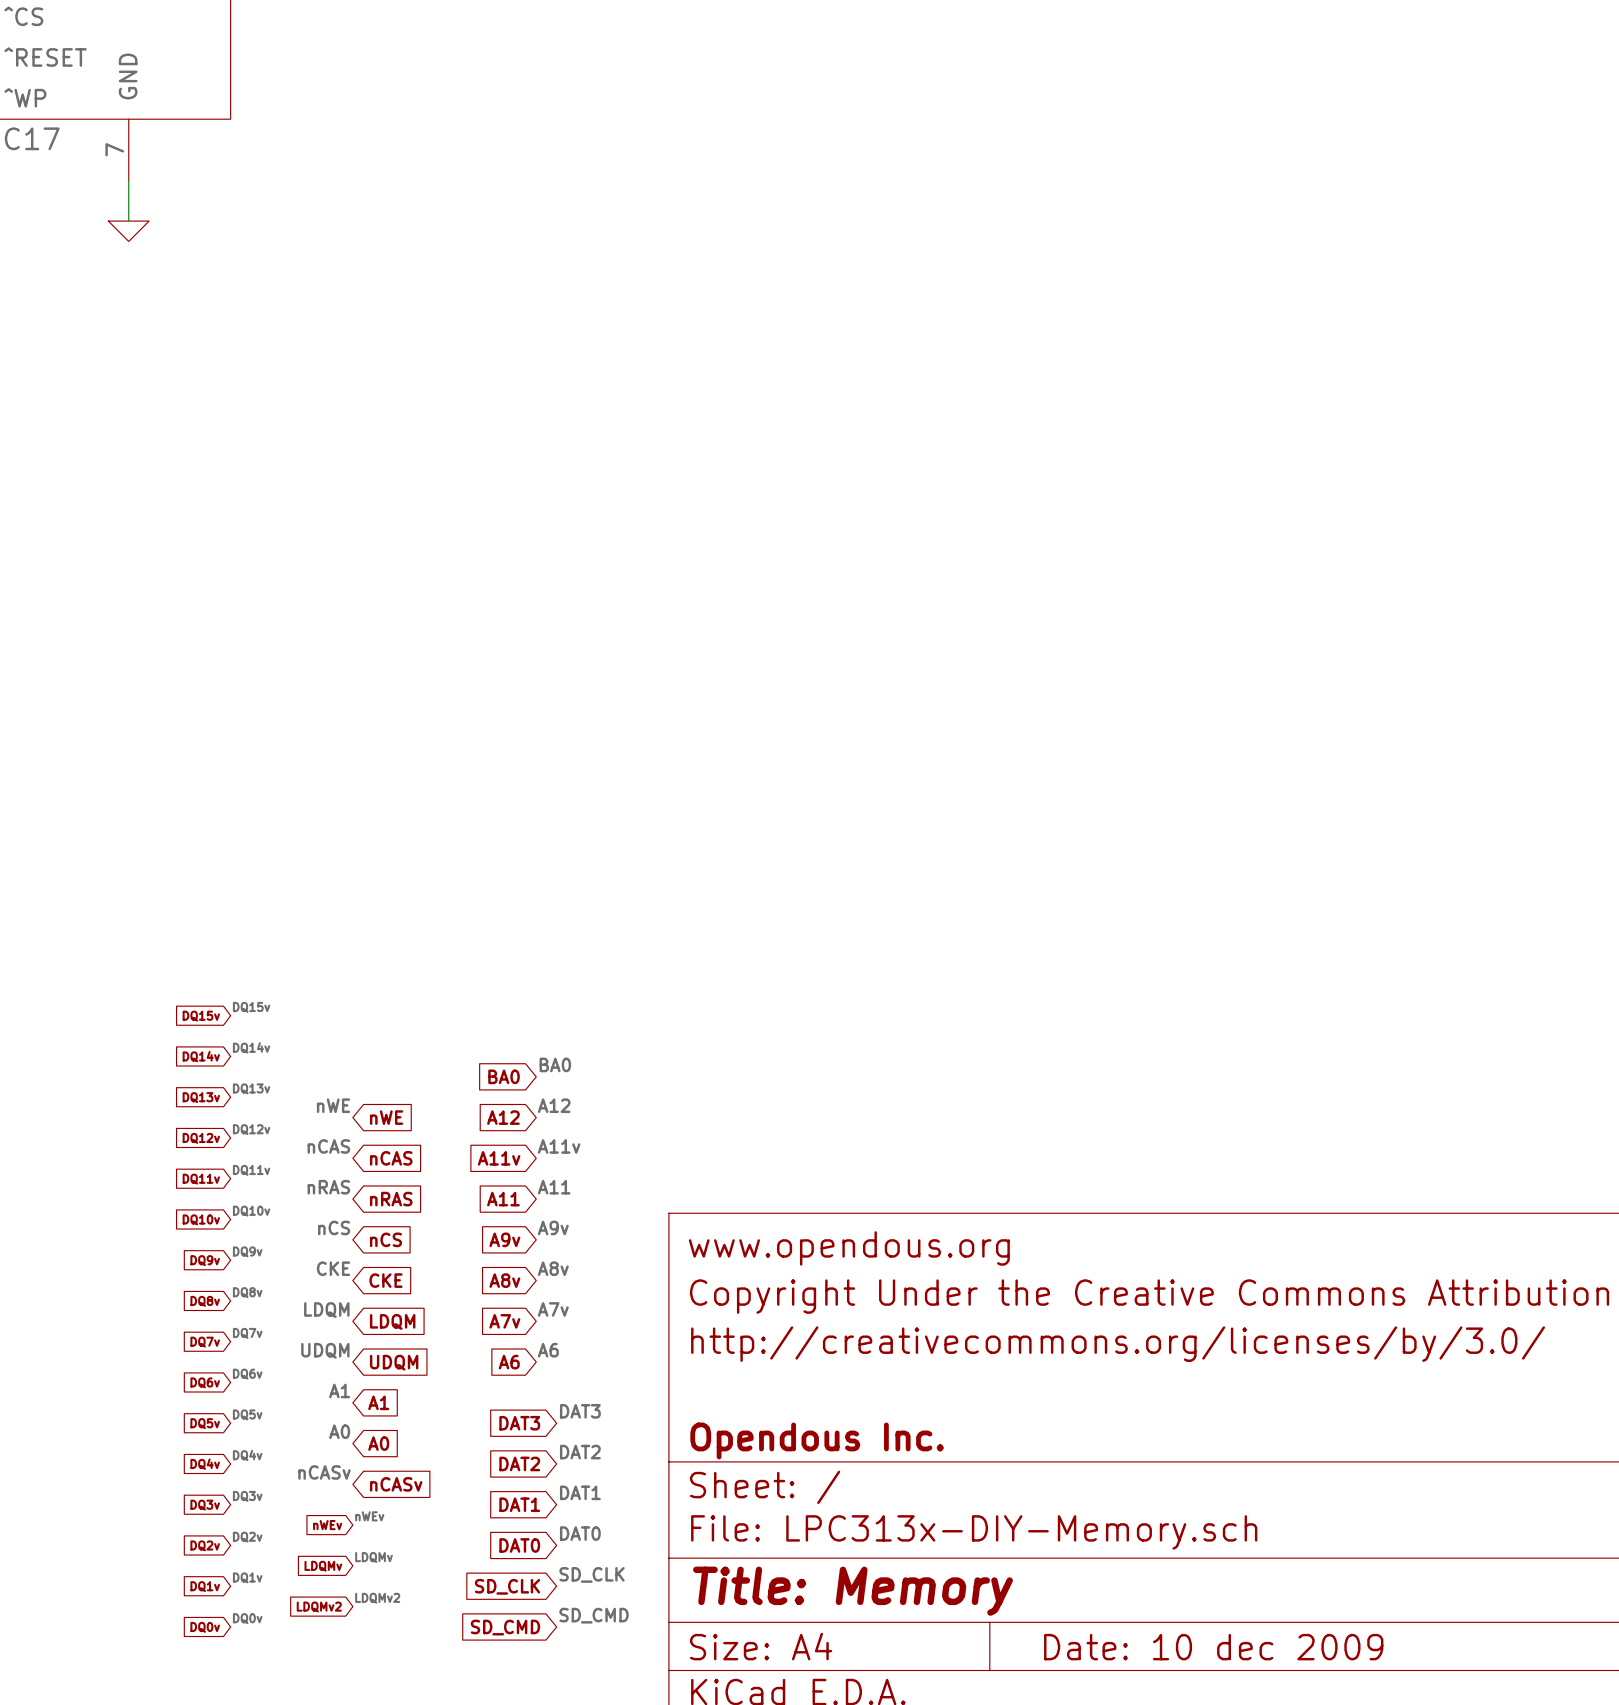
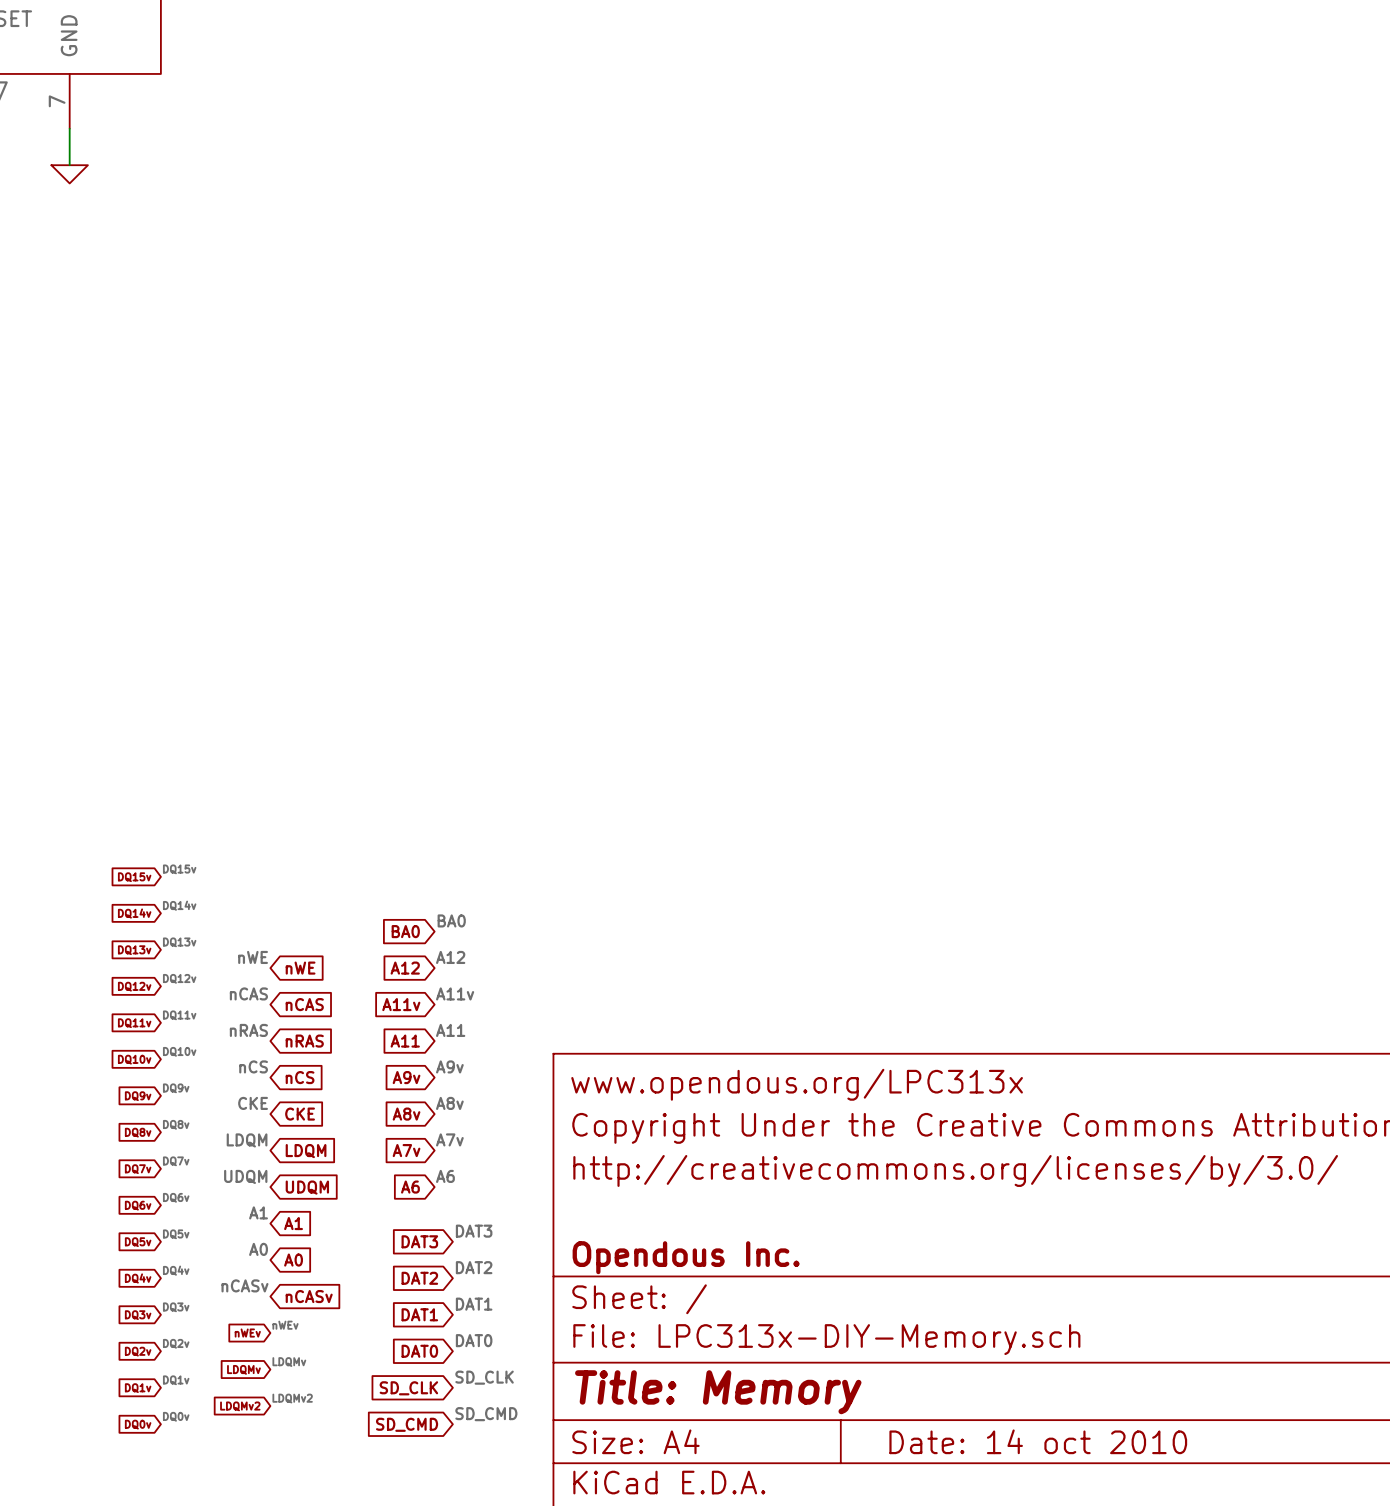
title block: www.opendous.org (849, 1248) -> www.opendous.org/LPC313x (797, 1084)
title block: Date: 10 dec 2009 (1213, 1647) -> Date: 14 oct 2010 (1038, 1441)

